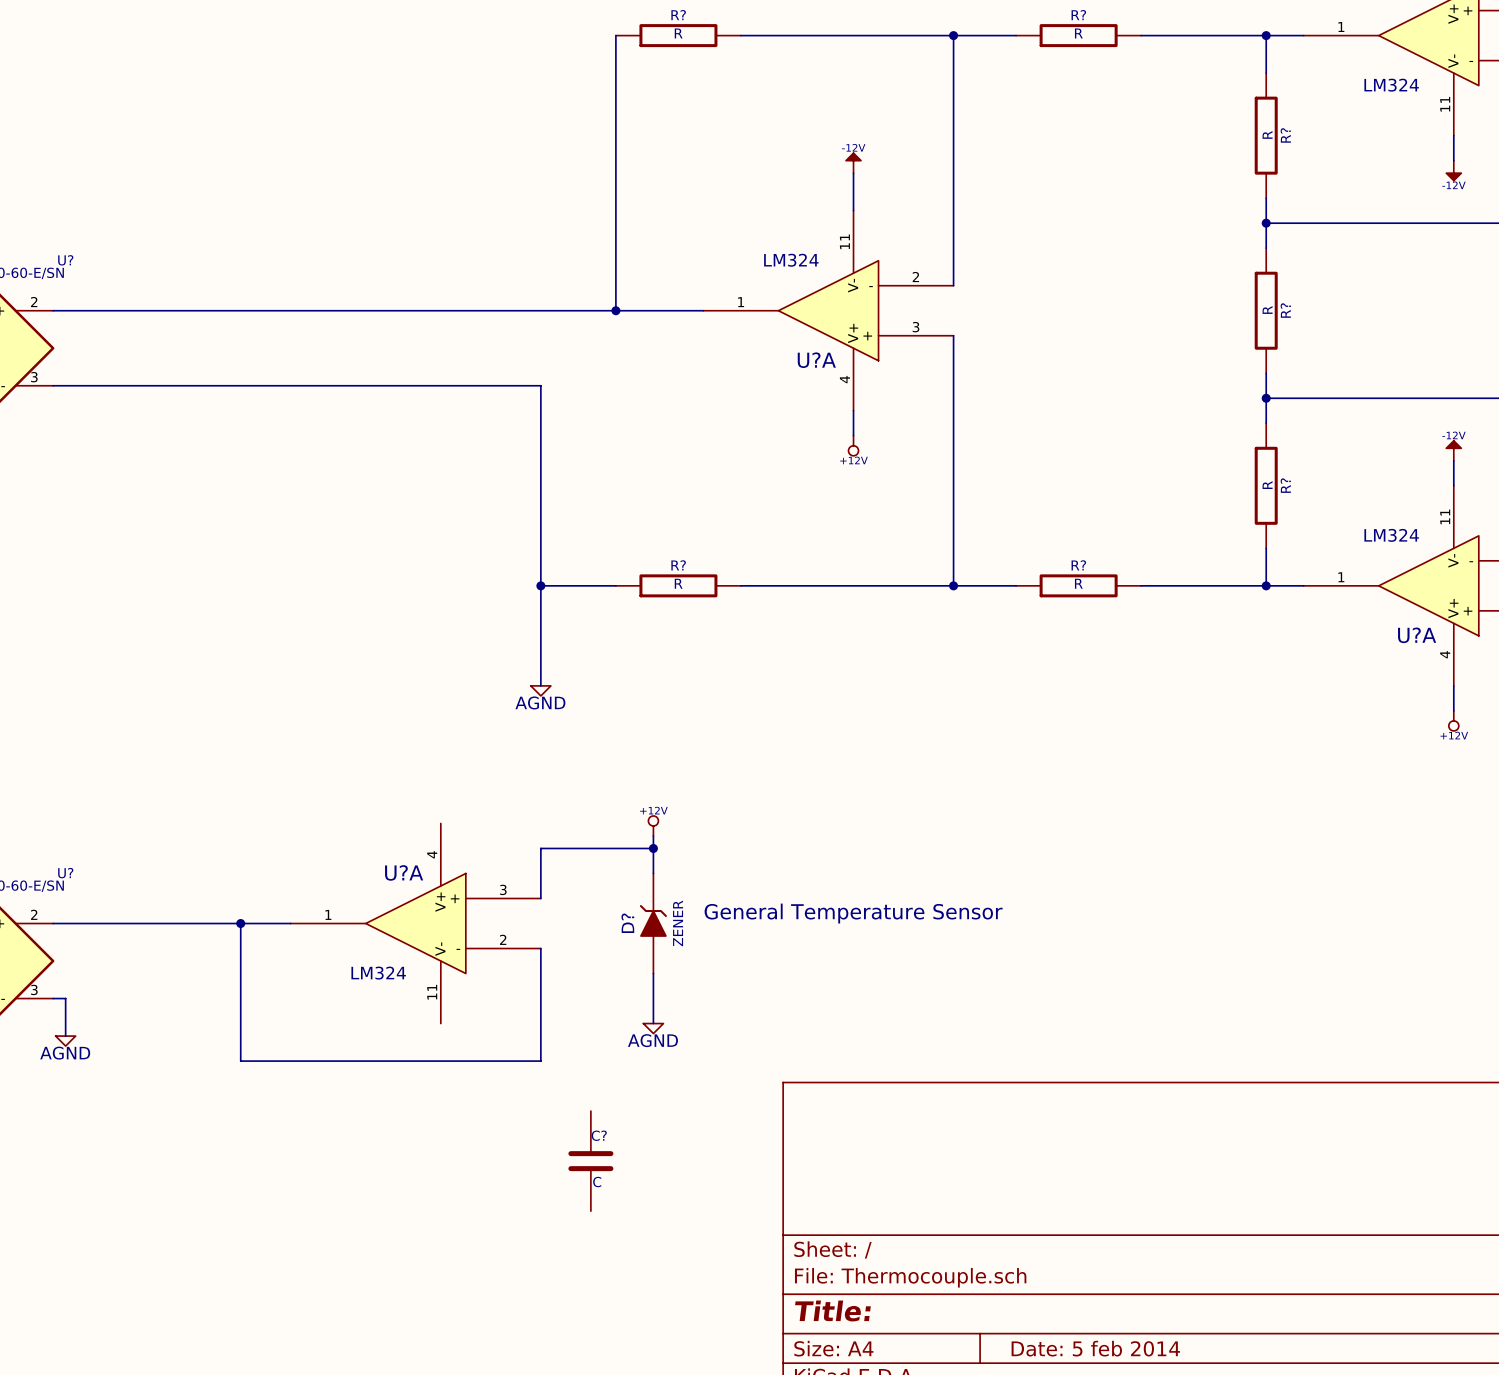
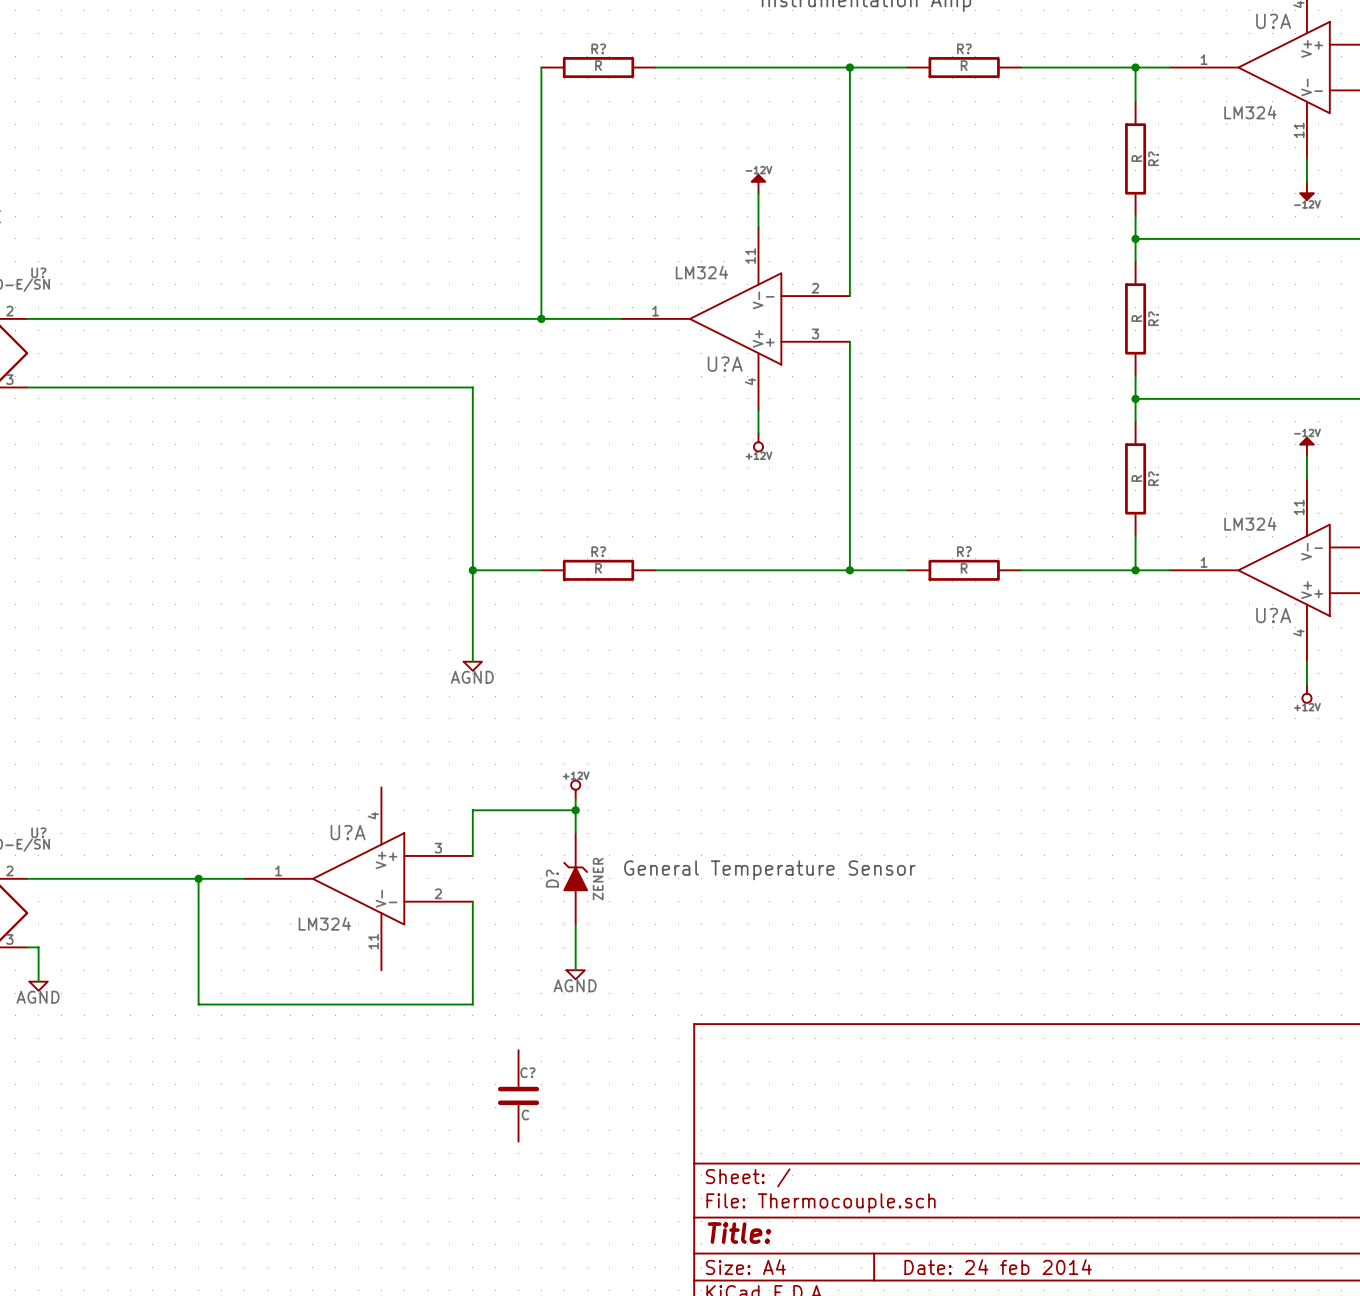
title block: Date: 5 feb 2014 (1095, 1348) -> Date: 24 feb 2014 (998, 1267)

